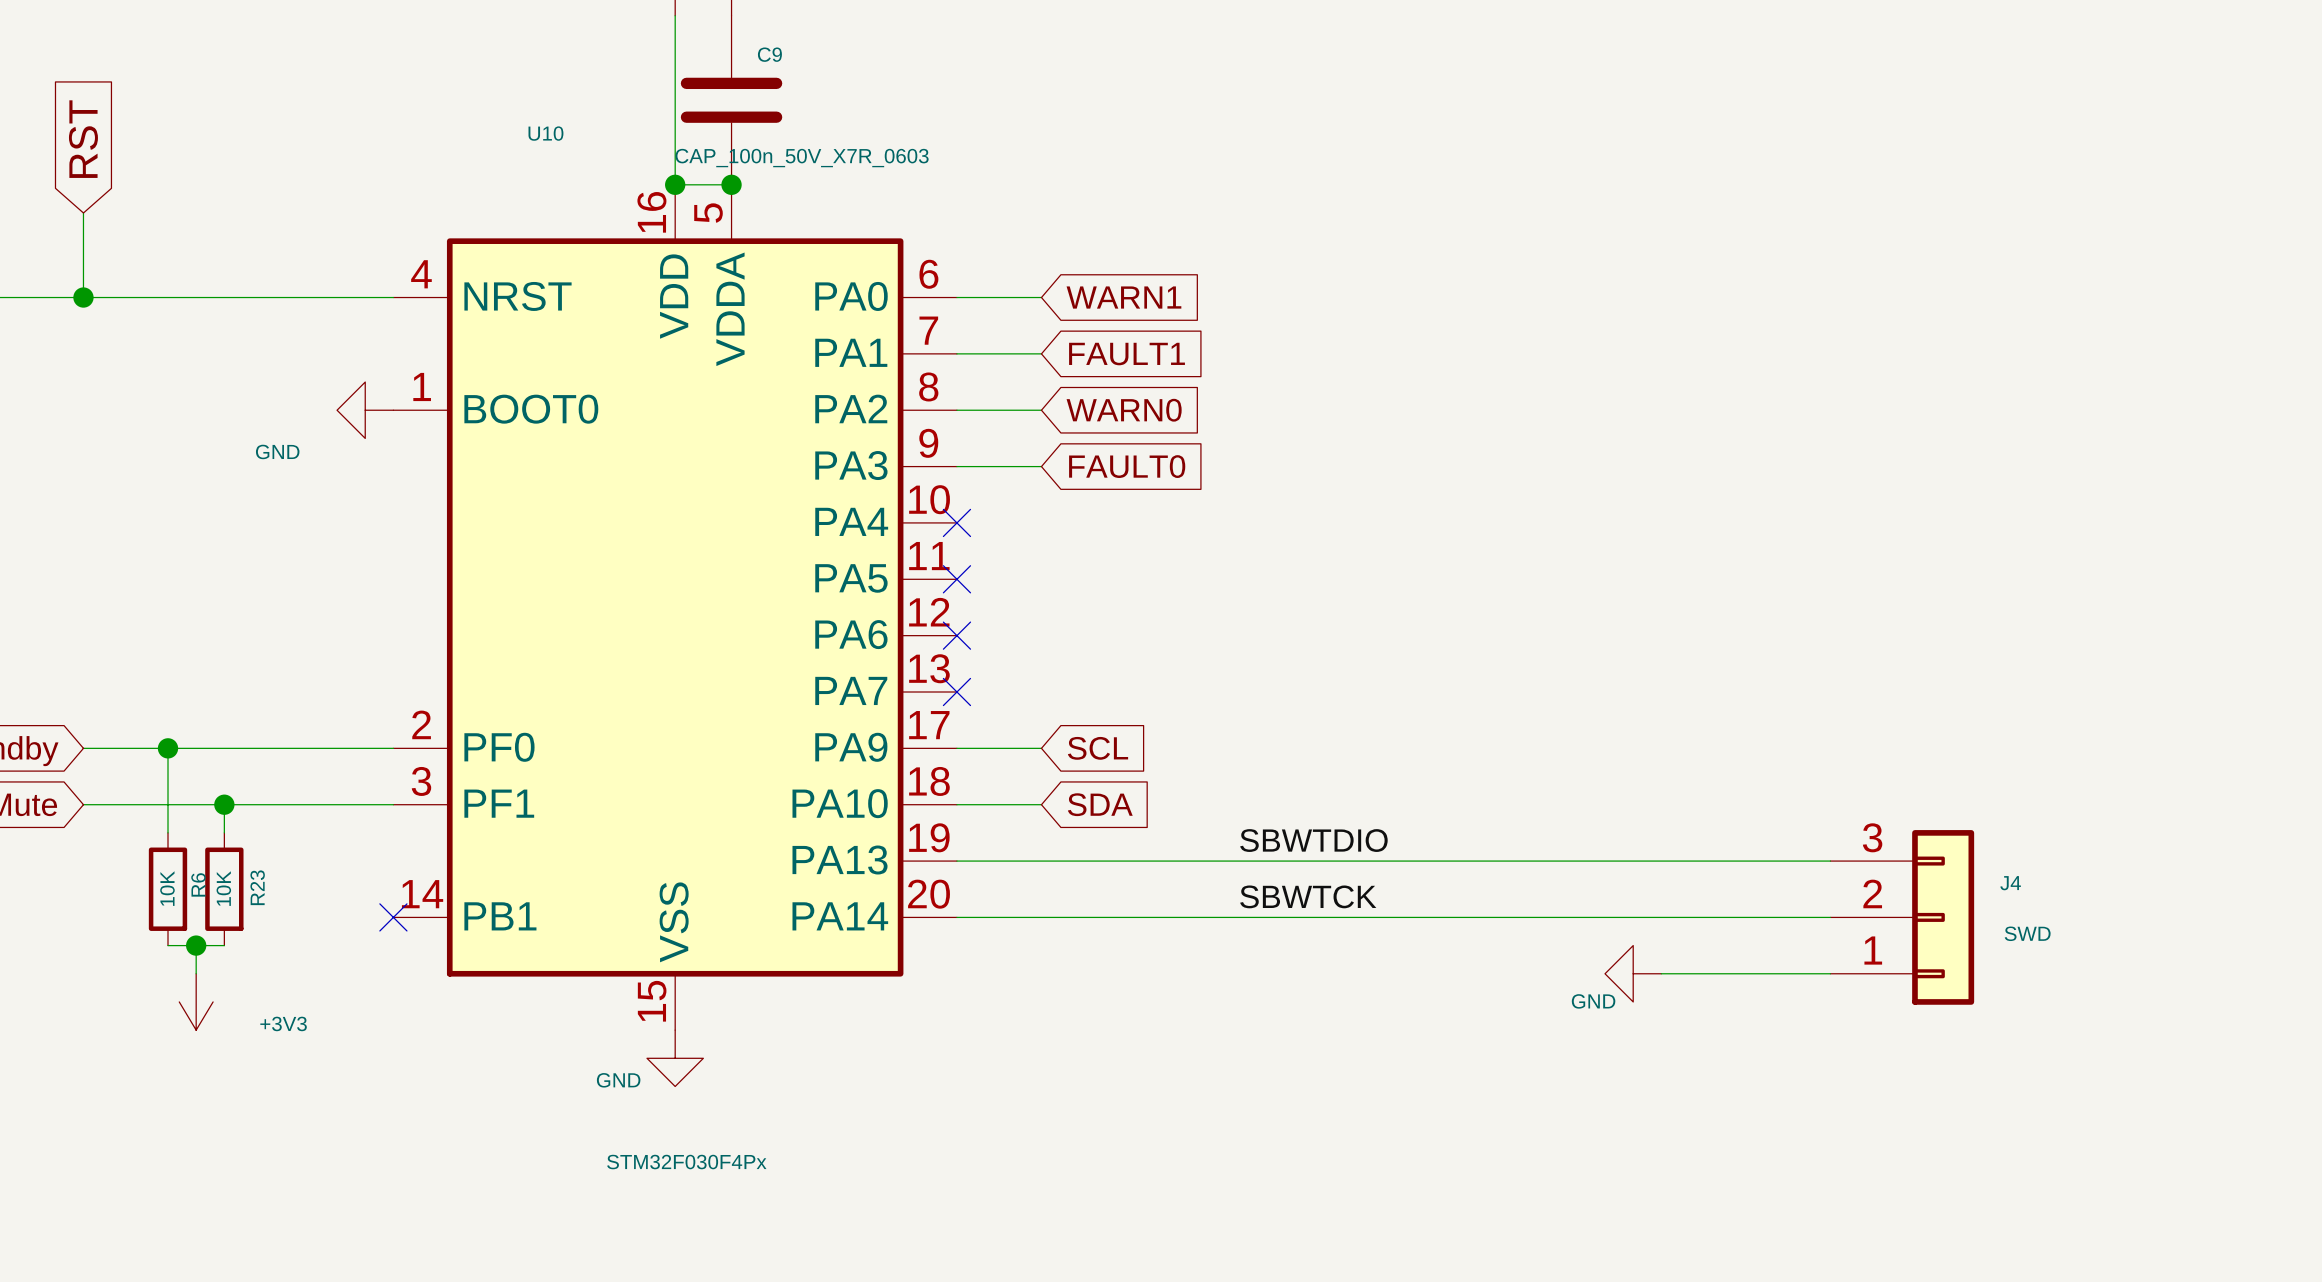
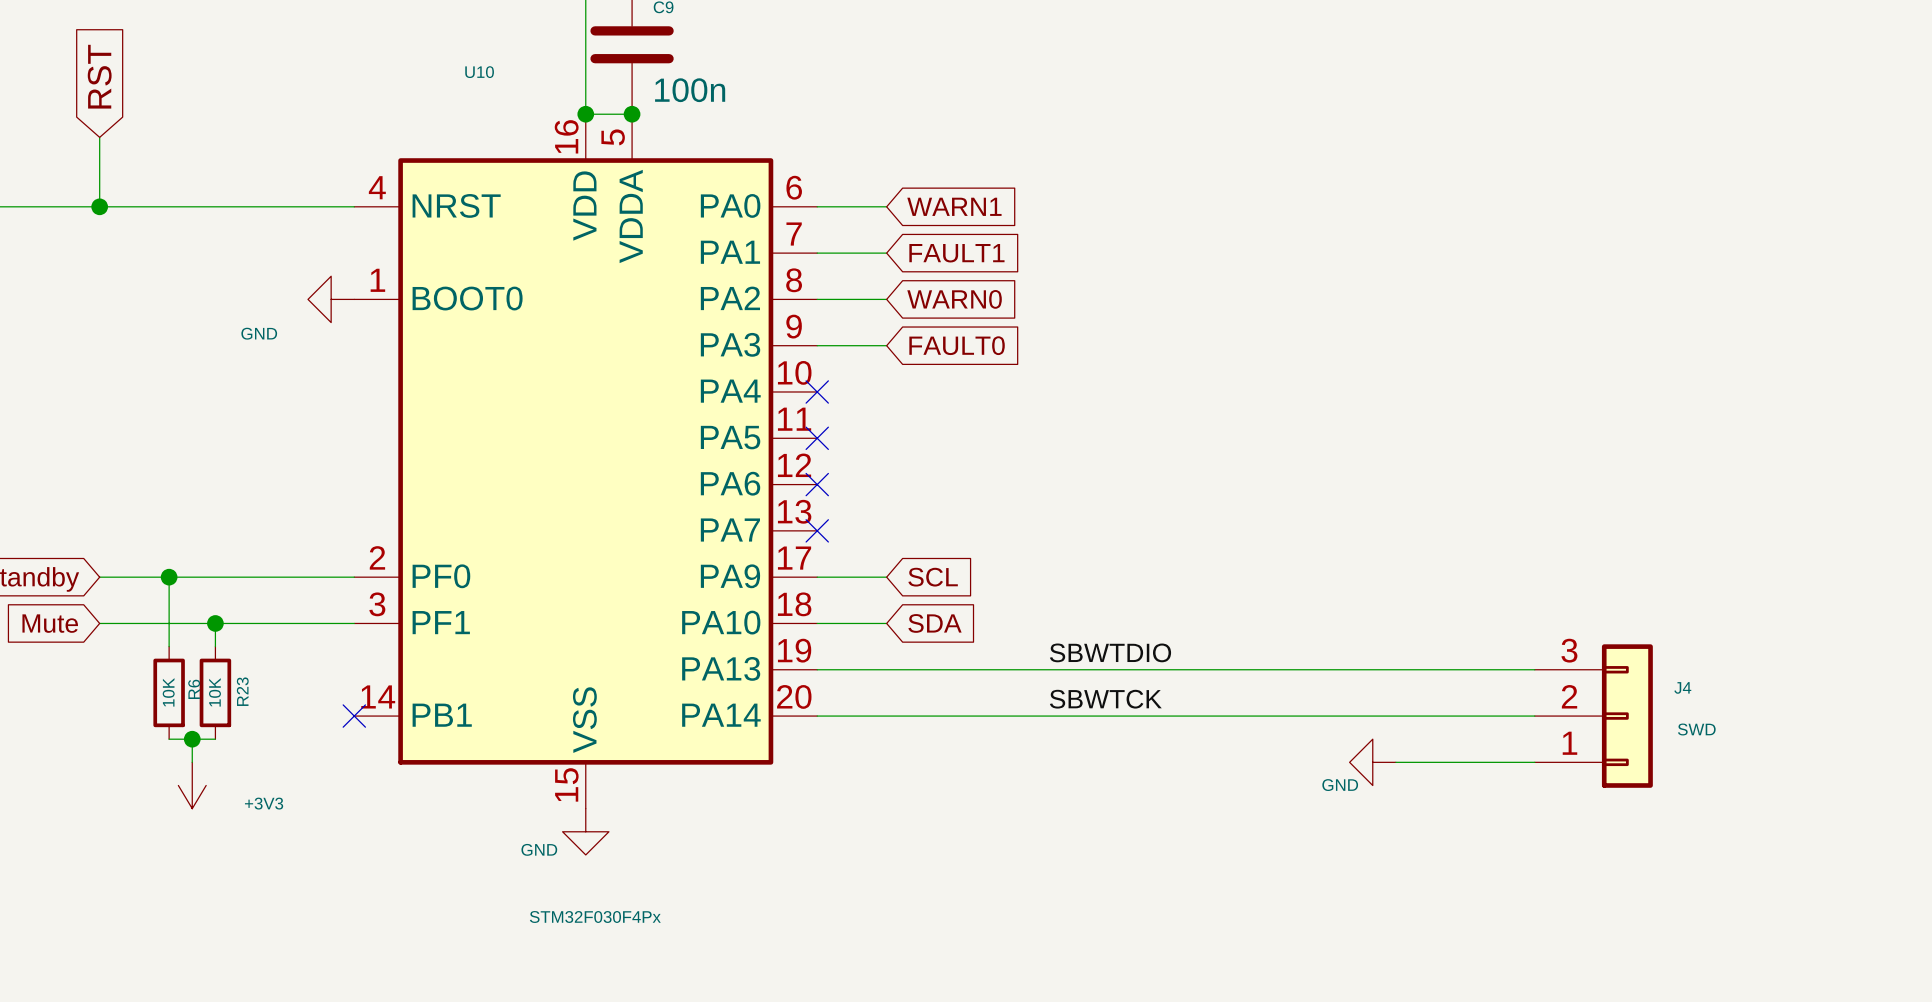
C9 value: CAP_100n_50V_X7R_0603 (802, 158) -> 100n (690, 90)

